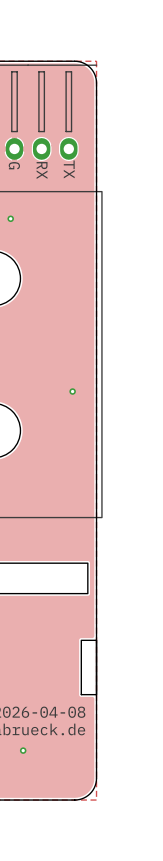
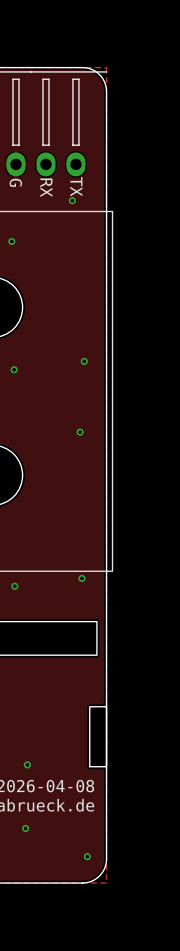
via: none -> (72, 200)
via: none -> (84, 361)
via: none -> (14, 369)
via: none -> (81, 578)
via: none -> (14, 586)
via: none -> (27, 764)
via: none -> (87, 856)

